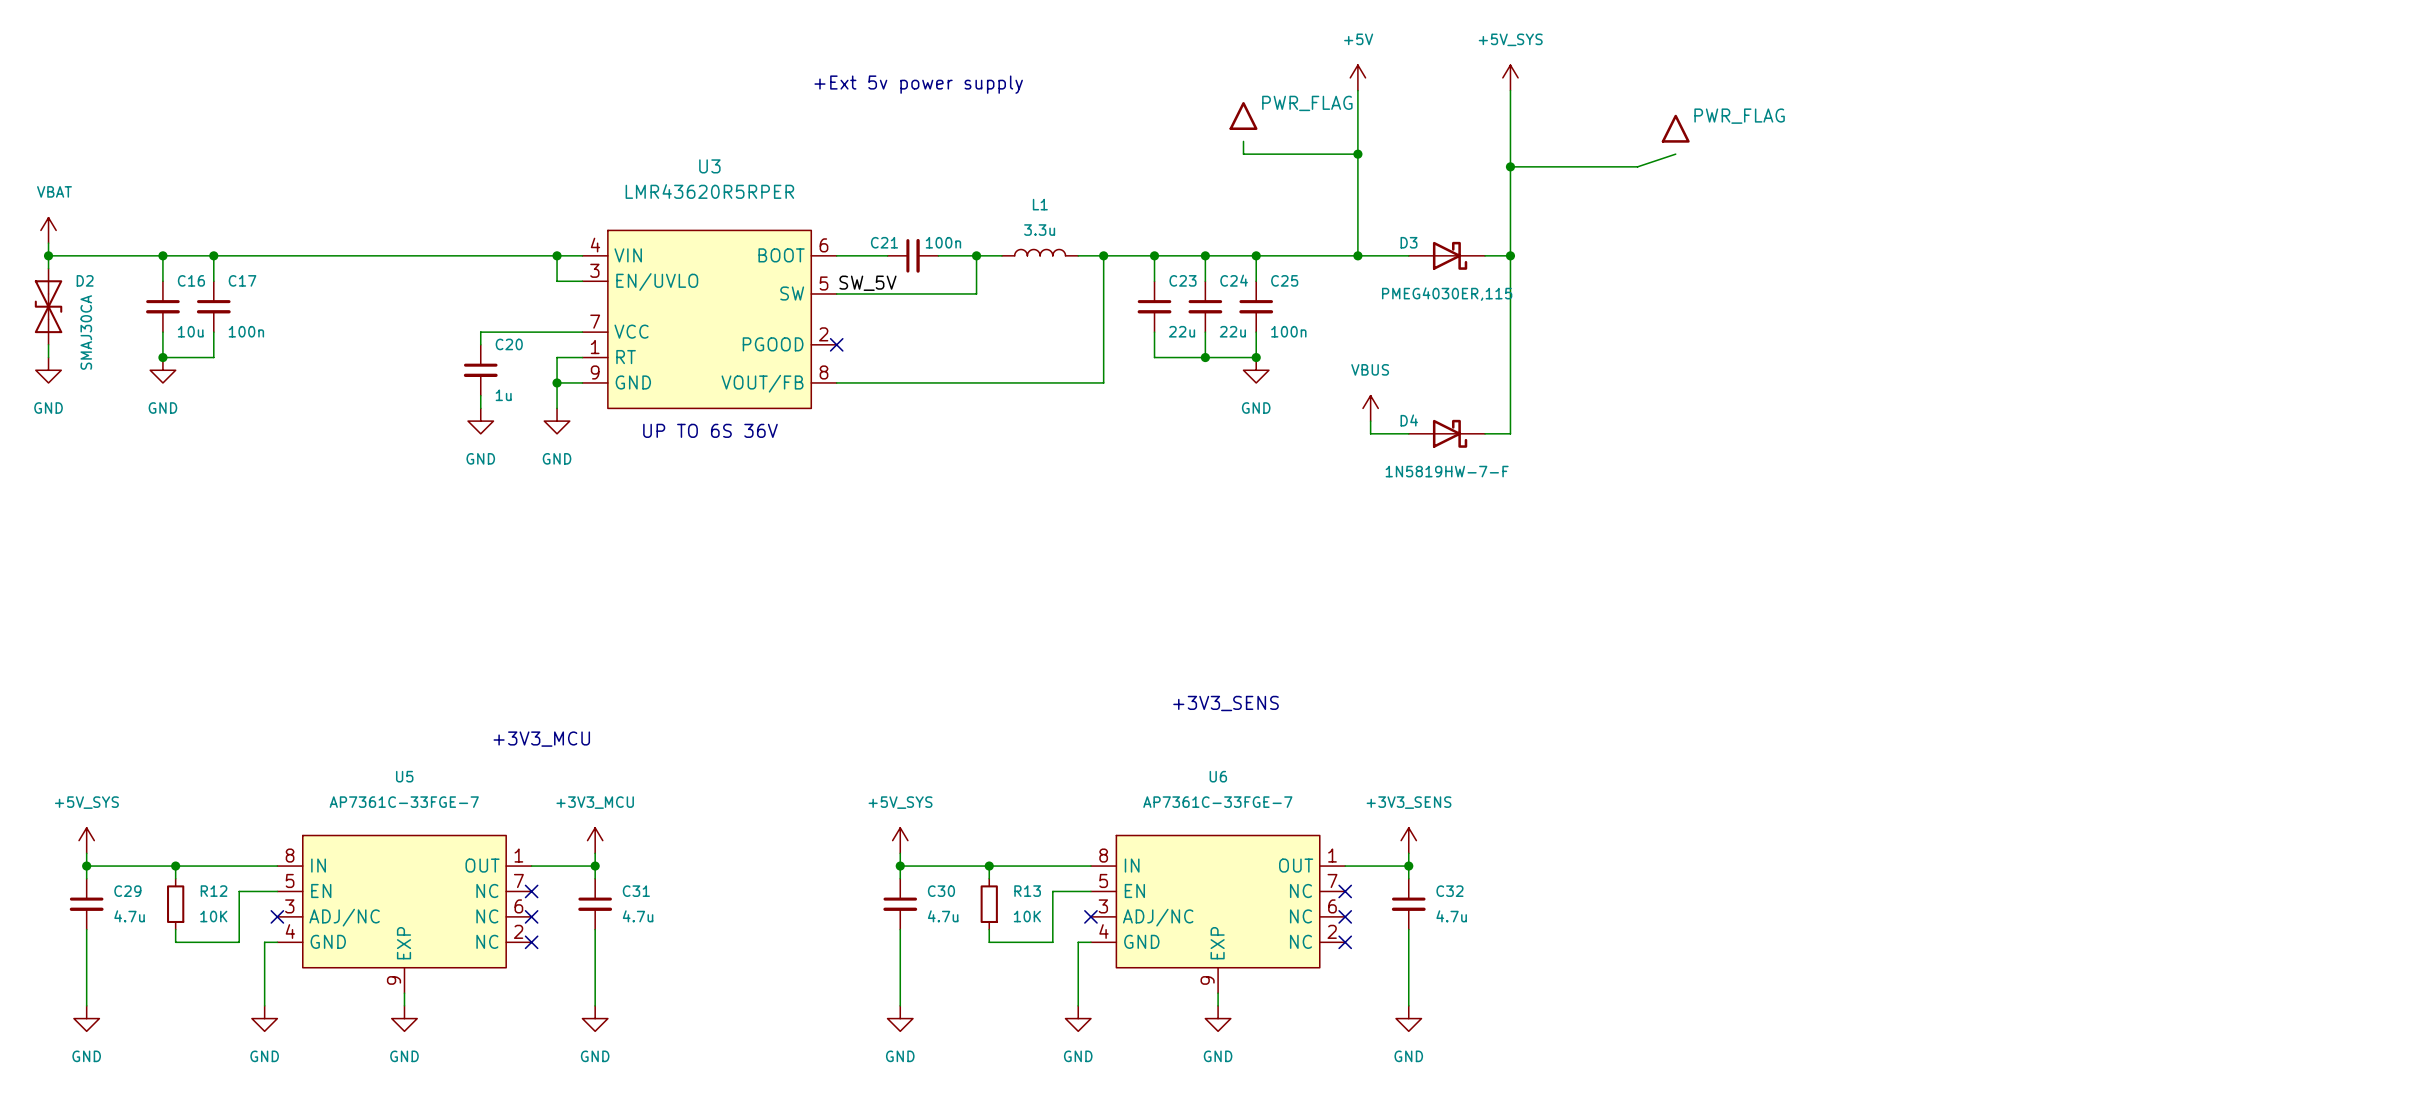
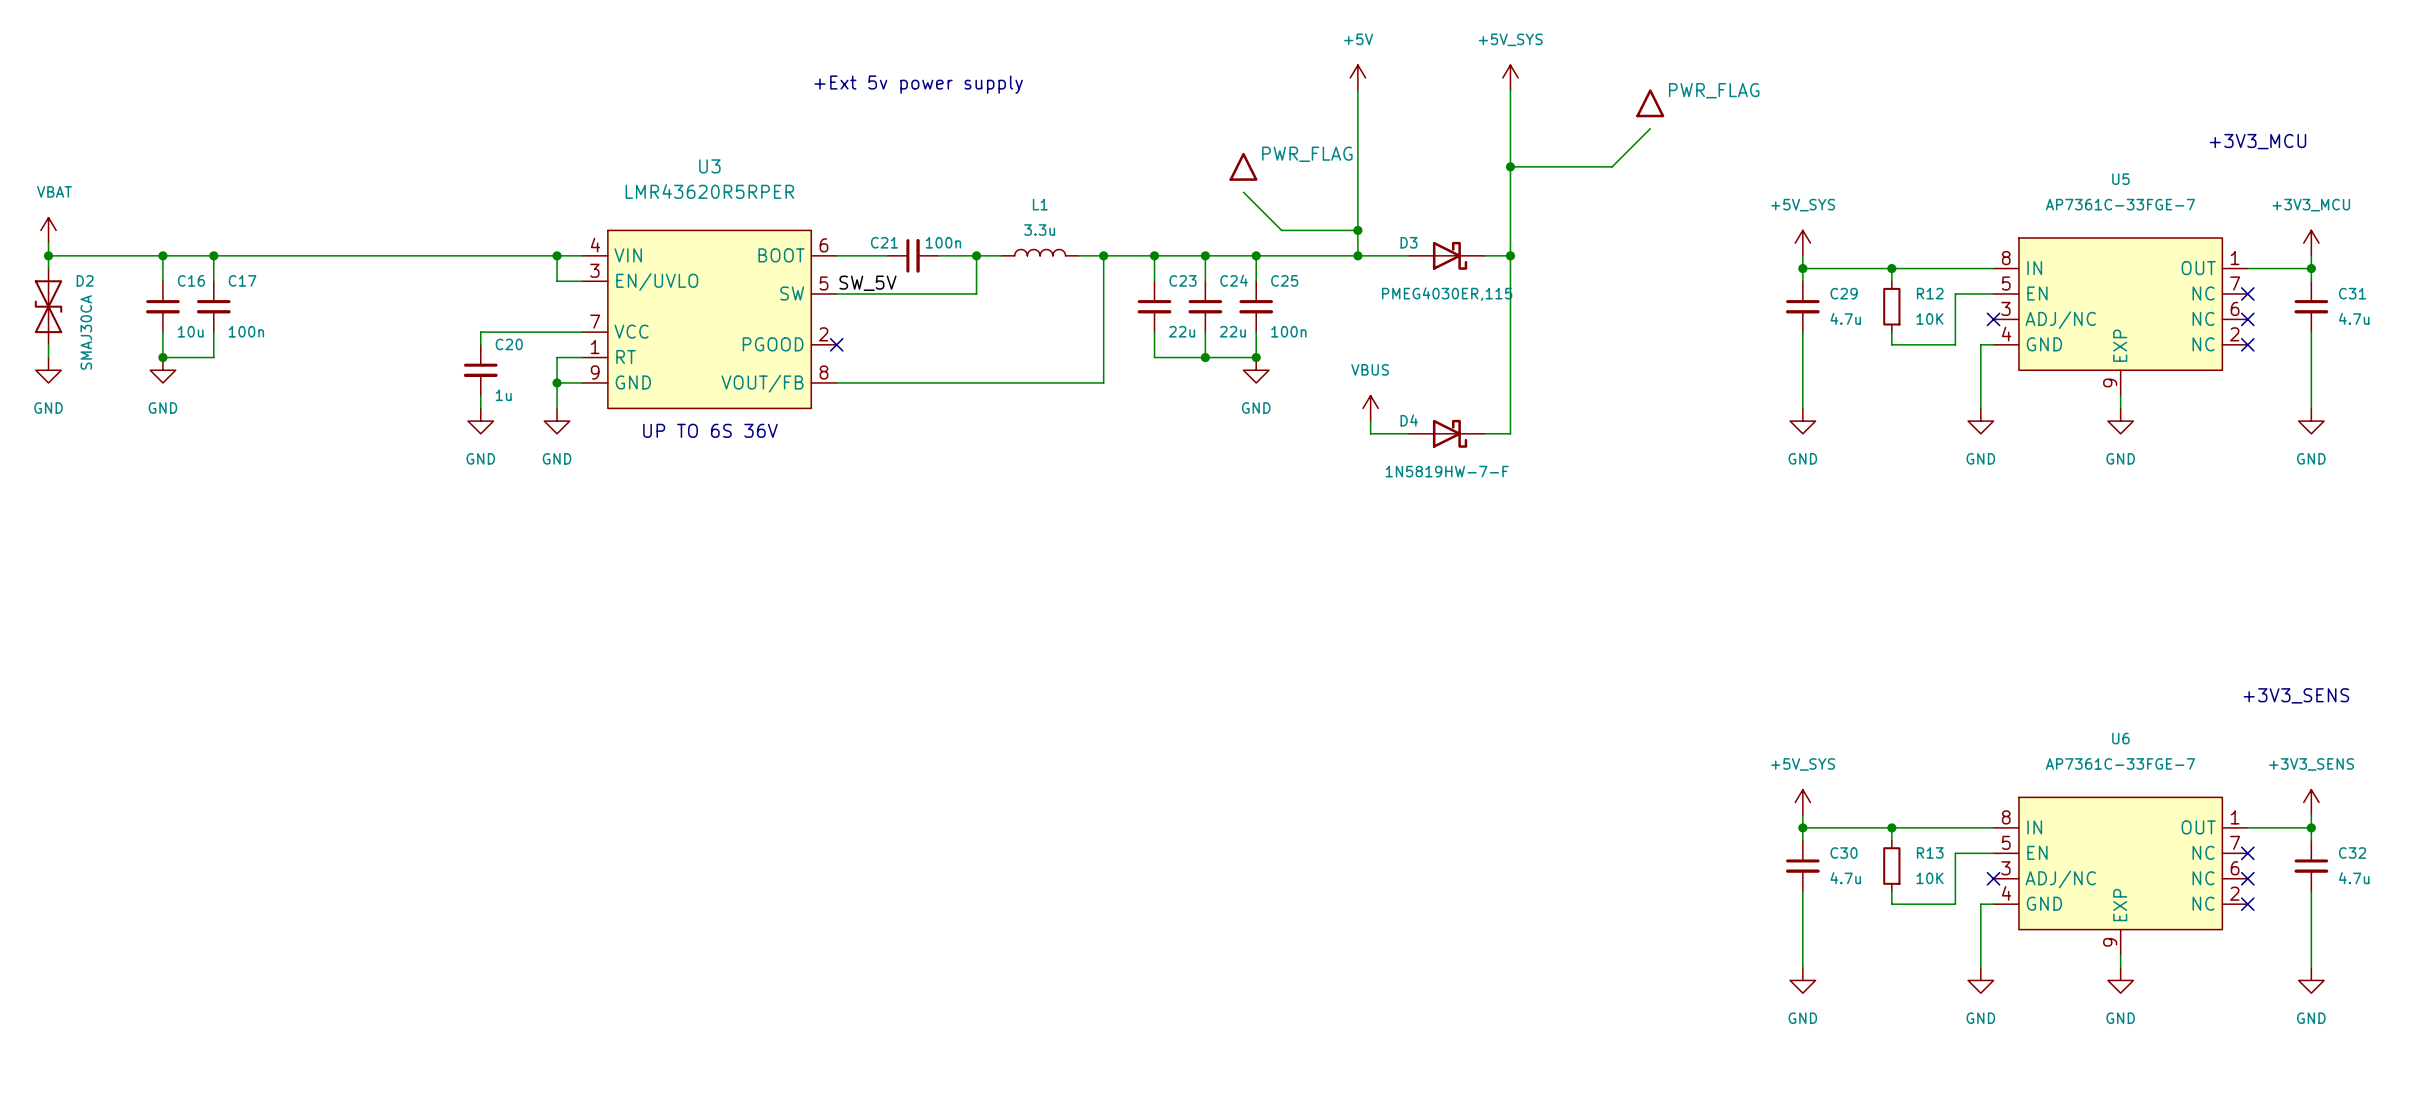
power symbol position: PWR_FLAG (1243, 116) -> PWR_FLAG (1243, 166)
power symbol position: PWR_FLAG (1675, 128) -> PWR_FLAG (1650, 103)
wire: (1243, 141) (1243, 154) (1357, 154) -> none
text: none -> +3V3_MCU (2257, 141)
junction: (1357, 154) -> none
wire: (1675, 154) (1637, 166) (1612, 166) -> (1650, 128) (1612, 166)
wire: none -> (1243, 192) (1281, 230) (1357, 230)
junction: none -> (1357, 230)
power symbol: none -> +5V_SYS (1802, 243)
power symbol: none -> +3V3_MCU (2311, 243)
wire: none -> (1802, 255) (1802, 281)
wire: none -> (2311, 255) (2311, 281)
wire: none -> (1802, 268) (1993, 268)
junction: none -> (1802, 268)
wire: none -> (1891, 268) (1891, 281)
junction: none -> (1891, 268)
wire: none -> (2247, 268) (2311, 268)
junction: none -> (2311, 268)
wire: none -> (1993, 293) (1955, 293) (1955, 344) (1891, 344) (1891, 332)
no-connect mark: none -> (2247, 293)
no-connect mark: none -> (1993, 319)
no-connect mark: none -> (2247, 319)
wire: none -> (1802, 332) (1802, 408)
wire: none -> (2311, 332) (2311, 408)
wire: none -> (1993, 344) (1980, 344) (1980, 408)
no-connect mark: none -> (2247, 344)
wire: none -> (2120, 395) (2120, 408)
power symbol: none -> GND (1802, 421)
power symbol: none -> GND (1980, 421)
power symbol: none -> GND (2120, 421)
power symbol: none -> GND (2311, 421)
text: none -> +3V3_SENS (2296, 695)
text: +3V3_SENS (1226, 703) -> none
text: +3V3_MCU (541, 739) -> none
power symbol: none -> +5V_SYS (1802, 802)
power symbol: none -> +3V3_SENS (2311, 802)
wire: none -> (1802, 815) (1802, 840)
wire: none -> (2311, 815) (2311, 840)
wire: none -> (1802, 827) (1993, 827)
junction: none -> (1802, 827)
wire: none -> (1891, 827) (1891, 840)
junction: none -> (1891, 827)
wire: none -> (2247, 827) (2311, 827)
junction: none -> (2311, 827)
power symbol: +5V_SYS (86, 840) -> none
power symbol: +3V3_MCU (595, 840) -> none
power symbol: +5V_SYS (900, 840) -> none
power symbol: +3V3_SENS (1408, 840) -> none
wire: (86, 853) (86, 878) -> none
wire: (595, 853) (595, 878) -> none
wire: (900, 853) (900, 878) -> none
wire: (1408, 853) (1408, 878) -> none
wire: none -> (1993, 853) (1955, 853) (1955, 904) (1891, 904) (1891, 891)
no-connect mark: none -> (2247, 853)
wire: (86, 866) (277, 866) -> none
junction: (86, 866) -> none
wire: (175, 866) (175, 878) -> none
junction: (175, 866) -> none
wire: (531, 866) (595, 866) -> none
junction: (595, 866) -> none
wire: (900, 866) (1090, 866) -> none
junction: (900, 866) -> none
wire: (989, 866) (989, 878) -> none
junction: (989, 866) -> none
wire: (1345, 866) (1408, 866) -> none
junction: (1408, 866) -> none
no-connect mark: none -> (1993, 878)
no-connect mark: none -> (2247, 878)
wire: (277, 891) (239, 891) (239, 942) (175, 942) (175, 929) -> none
no-connect mark: (531, 891) -> none
wire: (1090, 891) (1052, 891) (1052, 942) (989, 942) (989, 929) -> none
no-connect mark: (1345, 891) -> none
wire: none -> (1802, 891) (1802, 967)
wire: none -> (2311, 891) (2311, 967)
C29 position: (86, 904) -> (1802, 306)
R12 position: (175, 904) -> (1891, 306)
C31 position: (595, 904) -> (2311, 306)
C30 position: (900, 904) -> (1802, 866)
R13 position: (989, 904) -> (1891, 866)
C32 position: (1408, 904) -> (2311, 866)
wire: none -> (1993, 904) (1980, 904) (1980, 967)
no-connect mark: none -> (2247, 904)
U5 position: (404, 914) -> (2120, 316)
U6 position: (1218, 914) -> (2120, 876)
no-connect mark: (277, 916) -> none
no-connect mark: (531, 916) -> none
no-connect mark: (1090, 916) -> none
no-connect mark: (1345, 916) -> none
wire: (86, 929) (86, 1005) -> none
wire: (595, 929) (595, 1005) -> none
wire: (900, 929) (900, 1005) -> none
wire: (1408, 929) (1408, 1005) -> none
wire: (277, 942) (264, 942) (264, 1005) -> none
no-connect mark: (531, 942) -> none
wire: (1090, 942) (1078, 942) (1078, 1005) -> none
no-connect mark: (1345, 942) -> none
wire: none -> (2120, 955) (2120, 967)
power symbol: none -> GND (1802, 980)
power symbol: none -> GND (1980, 980)
power symbol: none -> GND (2120, 980)
power symbol: none -> GND (2311, 980)
wire: (404, 993) (404, 1005) -> none
wire: (1218, 993) (1218, 1005) -> none
power symbol: GND (86, 1018) -> none
power symbol: GND (264, 1018) -> none
power symbol: GND (404, 1018) -> none
power symbol: GND (595, 1018) -> none
power symbol: GND (900, 1018) -> none
power symbol: GND (1078, 1018) -> none
power symbol: GND (1218, 1018) -> none
power symbol: GND (1408, 1018) -> none

